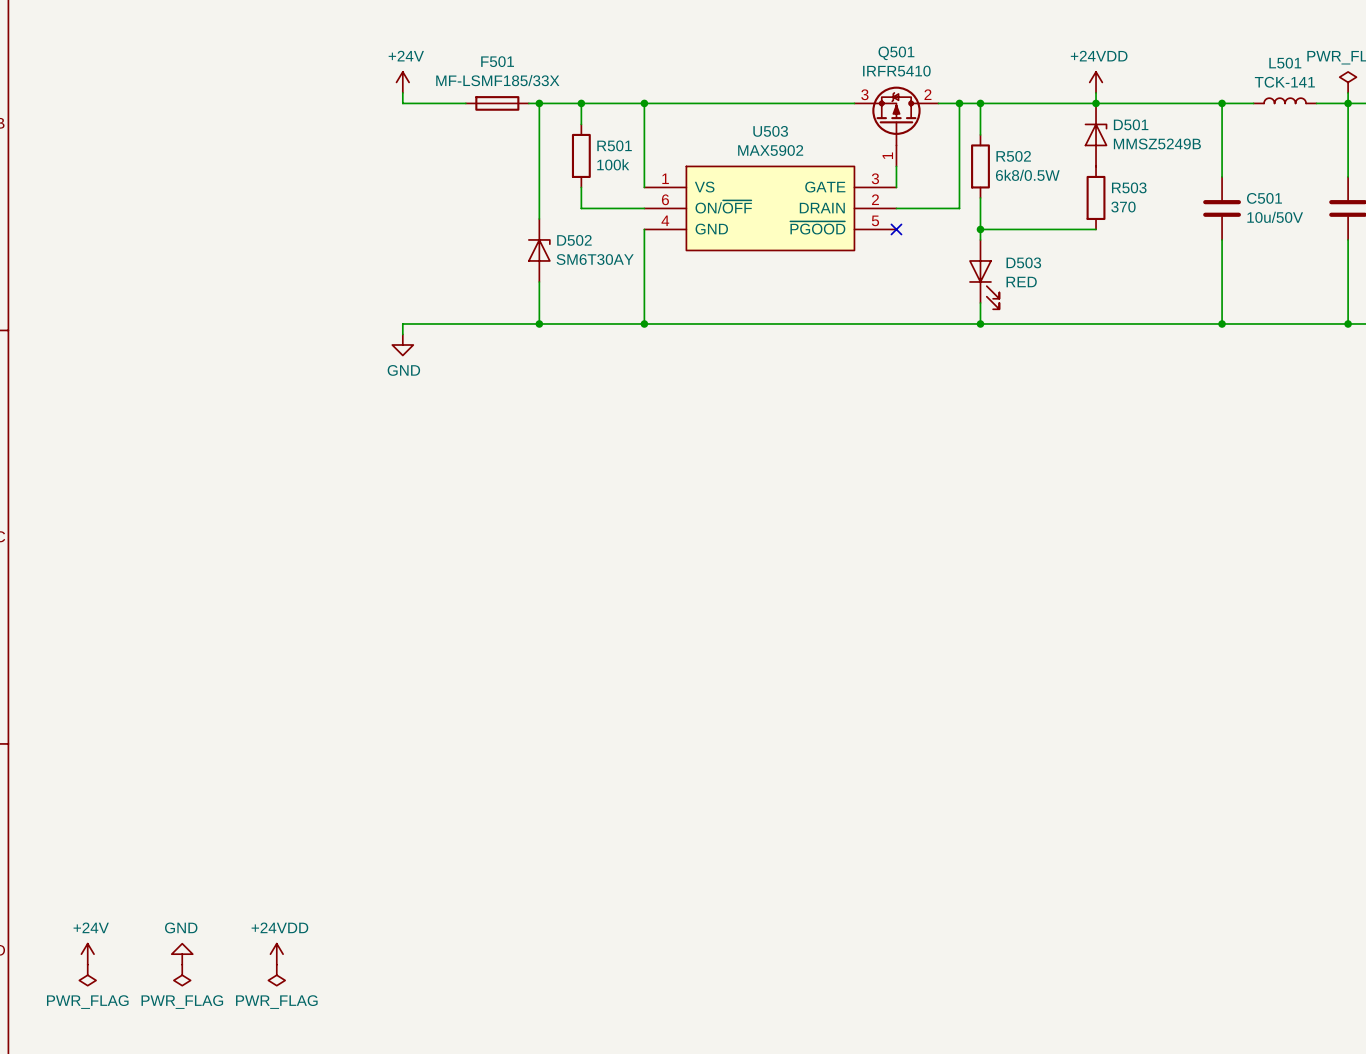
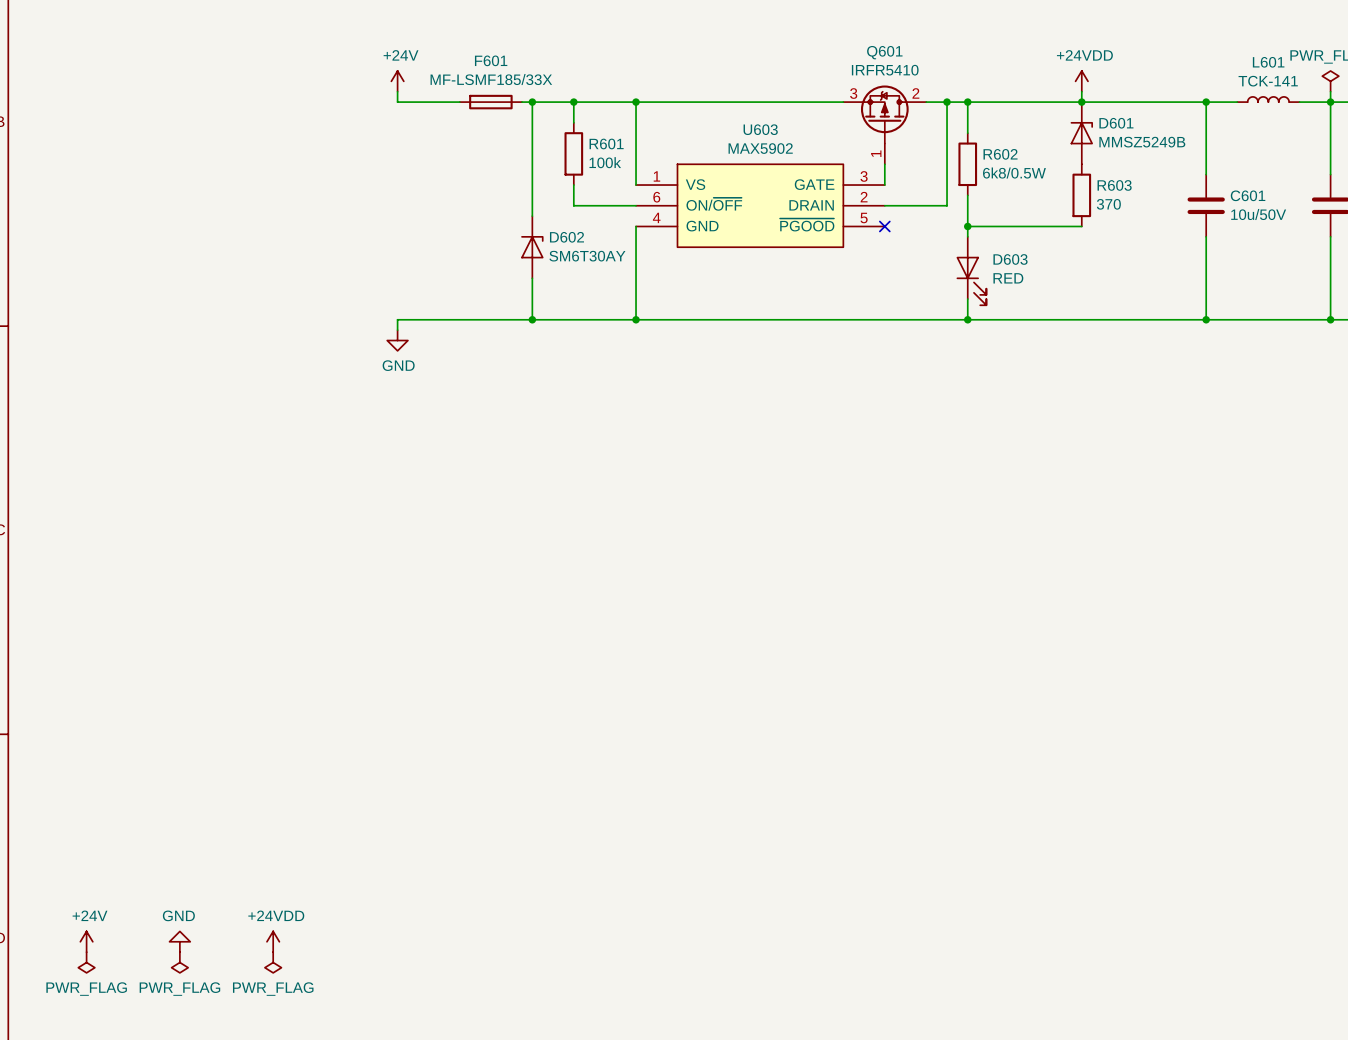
Q501 name: Q501 (896, 53) -> Q601 (884, 52)
F501 name: F501 (497, 61) -> F601 (491, 60)
L501 name: L501 (1285, 63) -> L601 (1268, 62)
D501 name: D501 (1131, 124) -> D601 (1116, 123)
U503 name: U503 (770, 131) -> U603 (760, 129)
R501 name: R501 (614, 145) -> R601 (606, 143)
R502 name: R502 (1013, 156) -> R602 (1000, 154)
R503 name: R503 (1129, 187) -> R603 (1114, 185)
C501 name: C501 (1264, 198) -> C601 (1248, 195)
D502 name: D502 (574, 240) -> D602 (566, 237)
D503 name: D503 (1023, 262) -> D603 (1010, 259)

